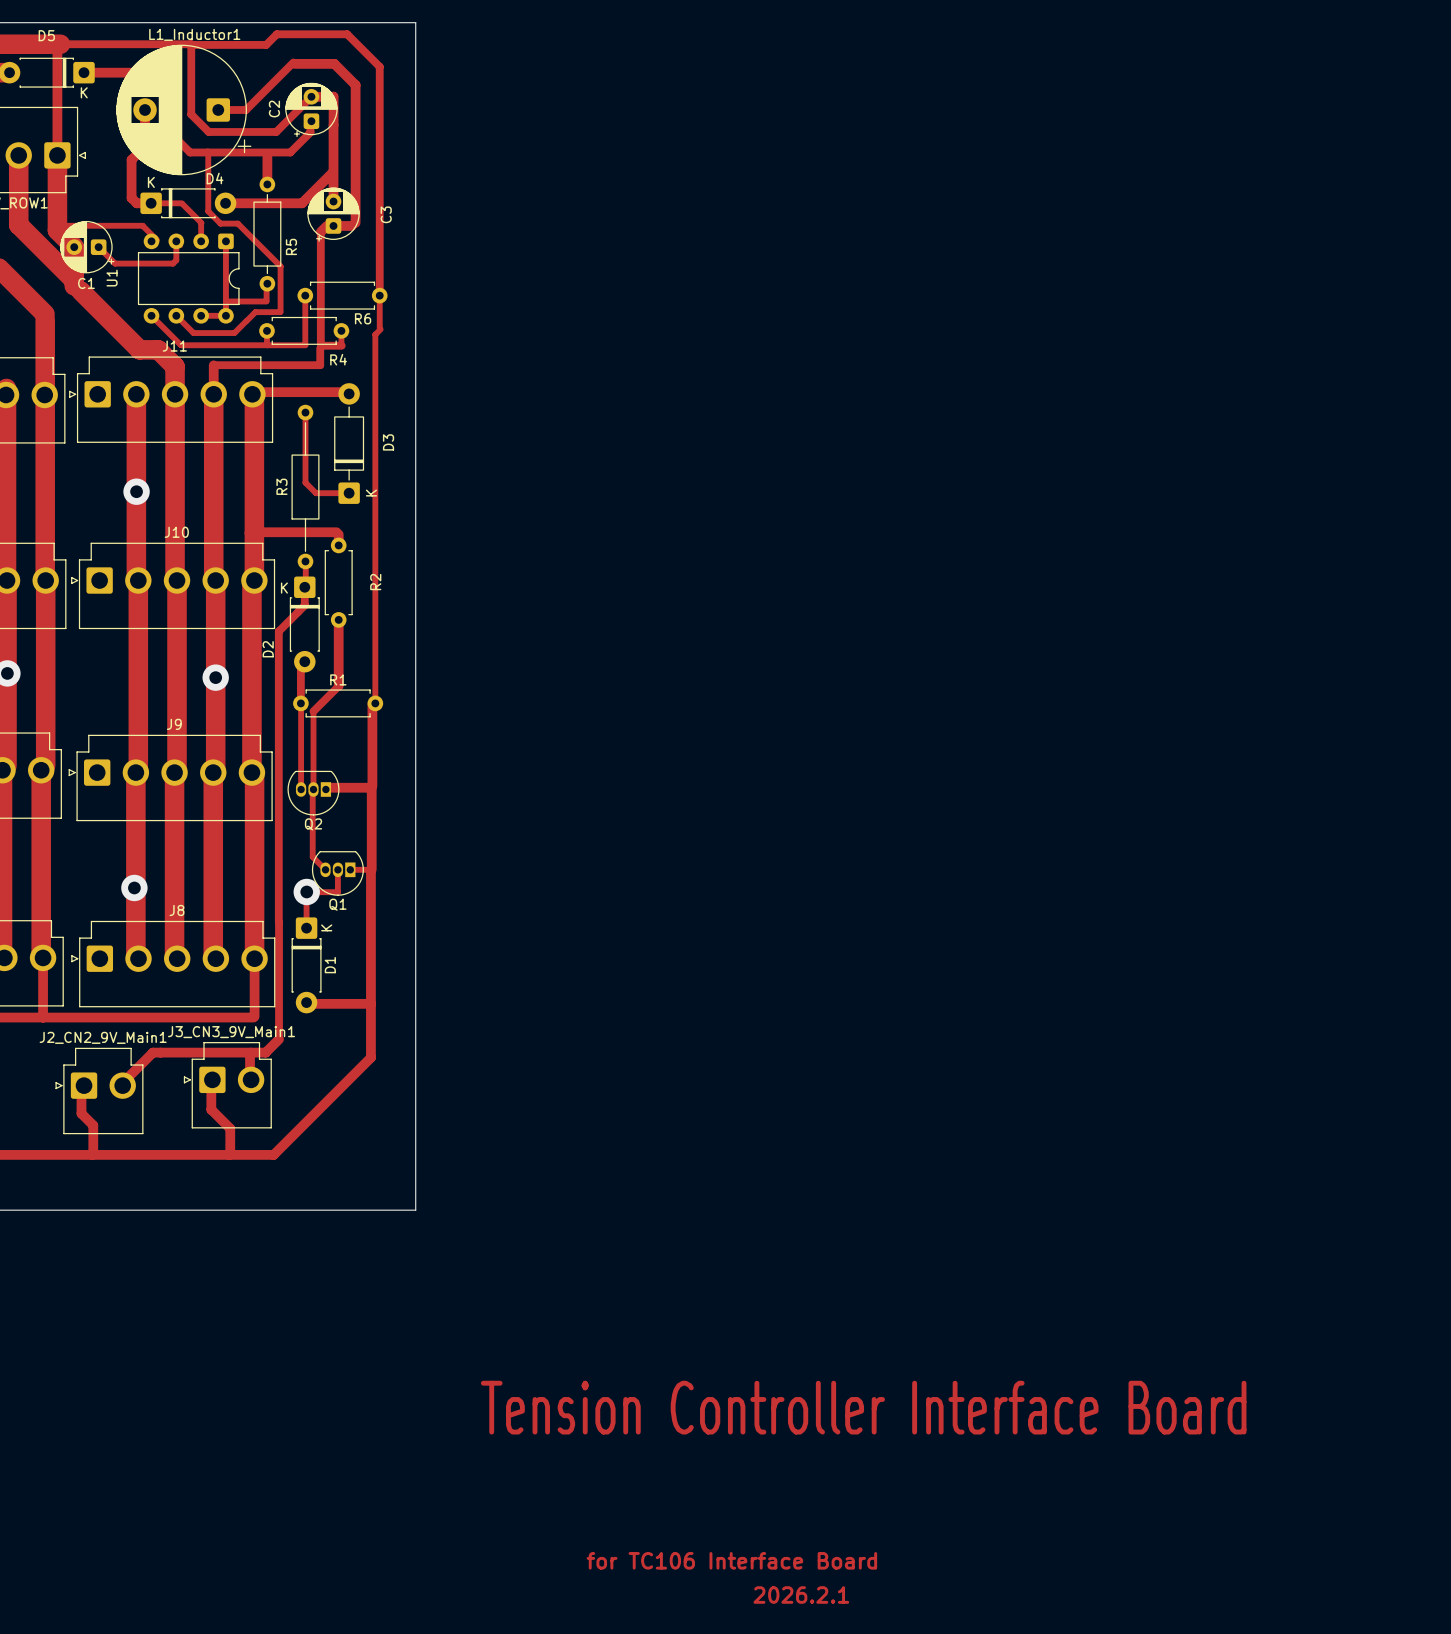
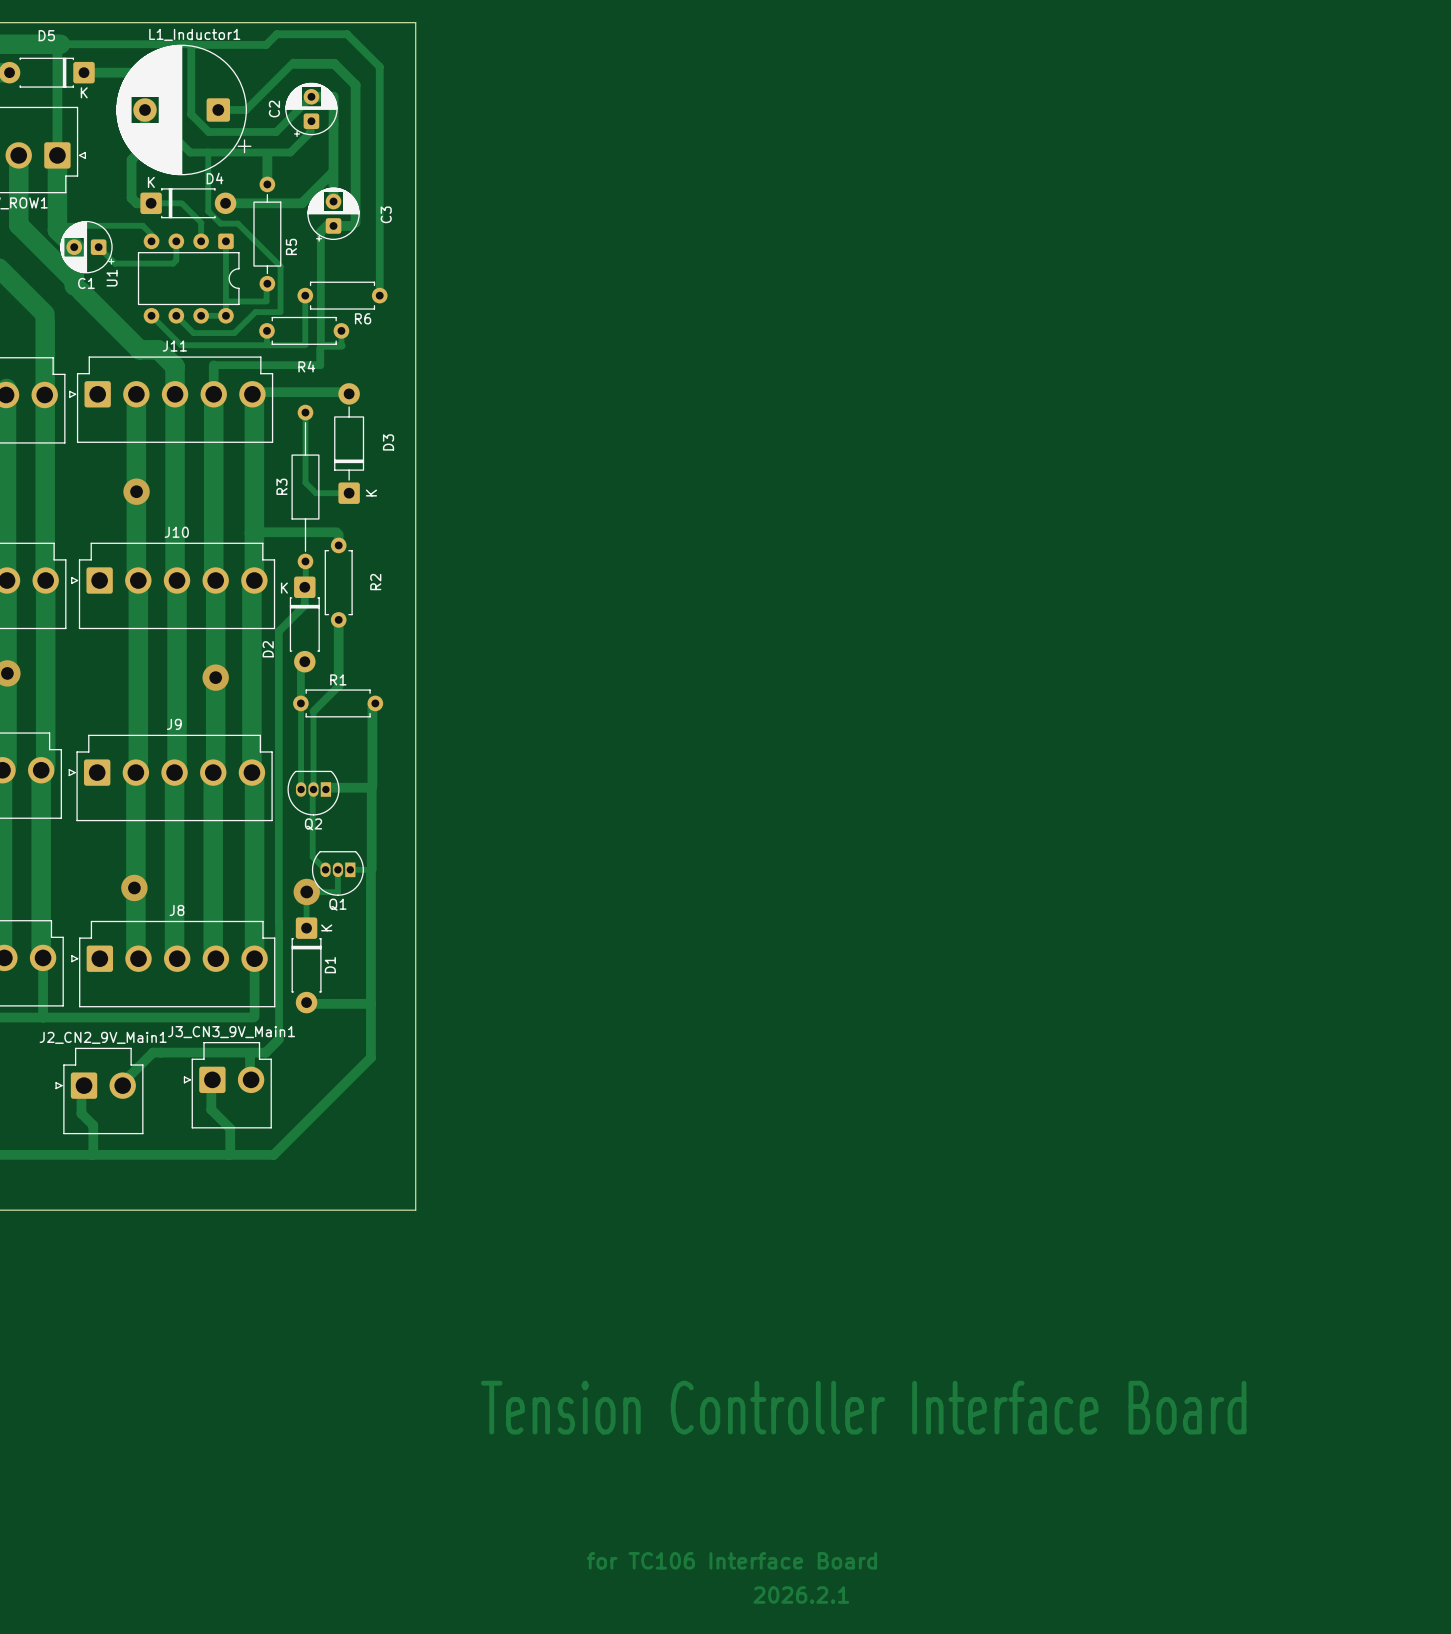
track: (379, 302) (380, 329) (375, 334) (375, 703) -> none
R4 name position: R4 (338, 359) -> R4 (306, 366)

